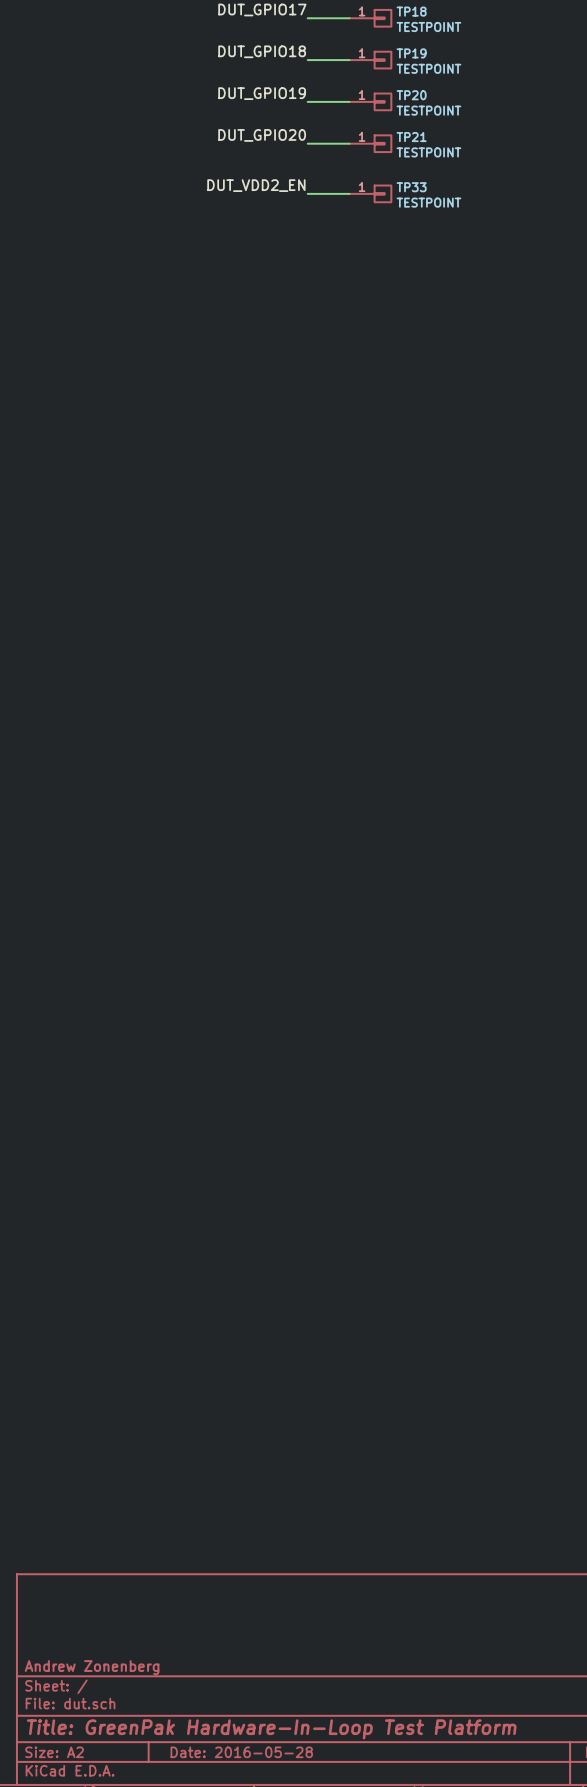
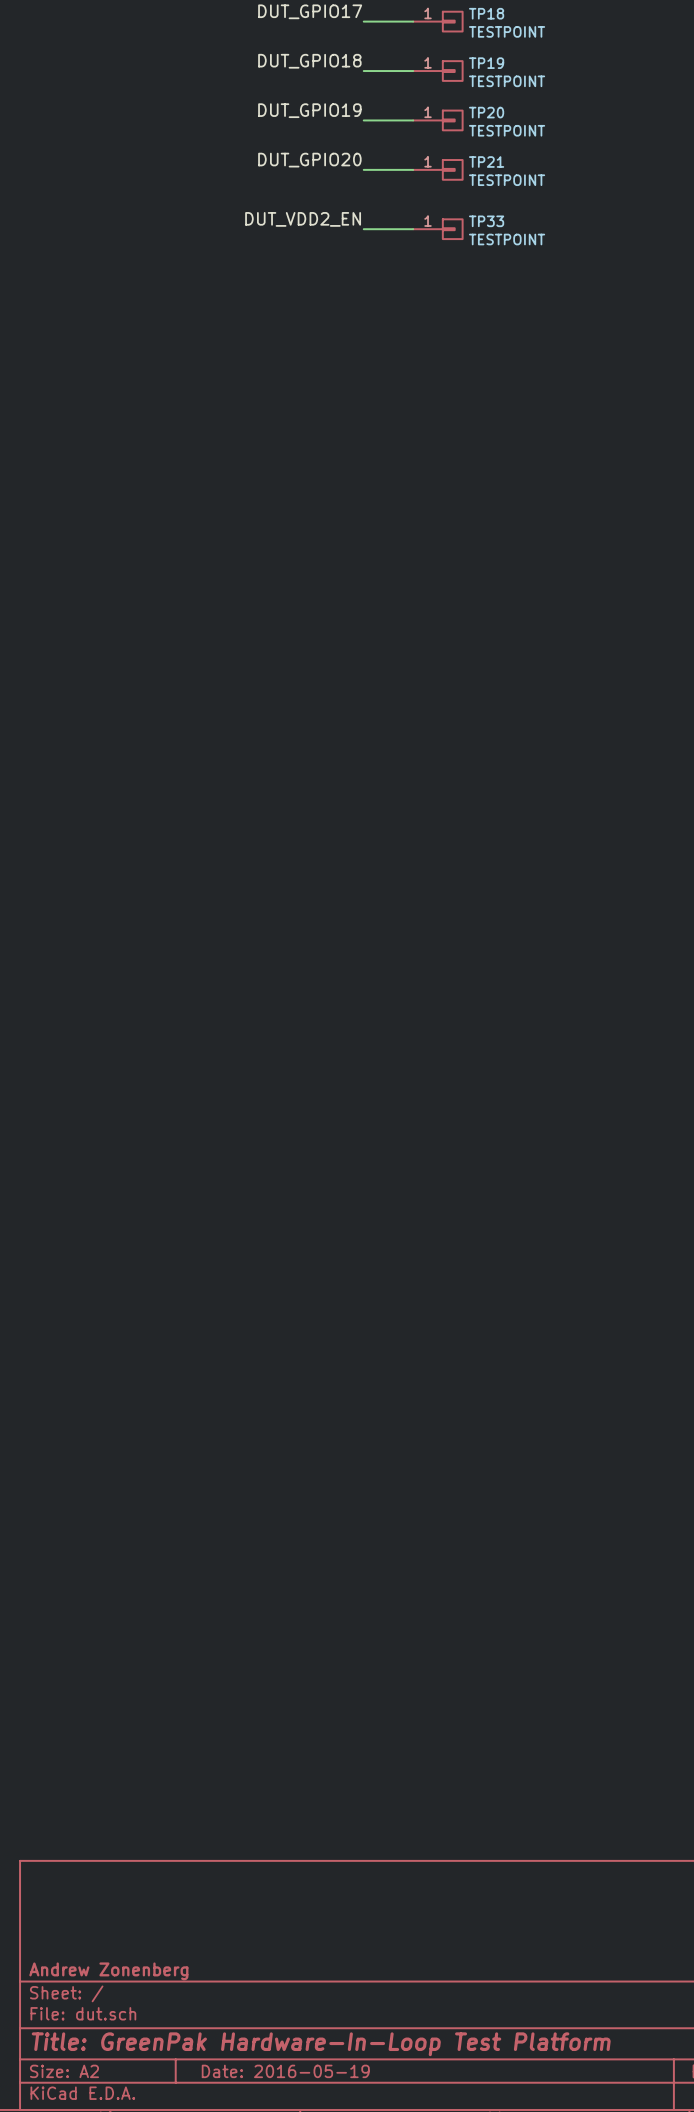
title block: Date: 2016-05-28 (241, 1752) -> Date: 2016-05-19 (285, 2071)

